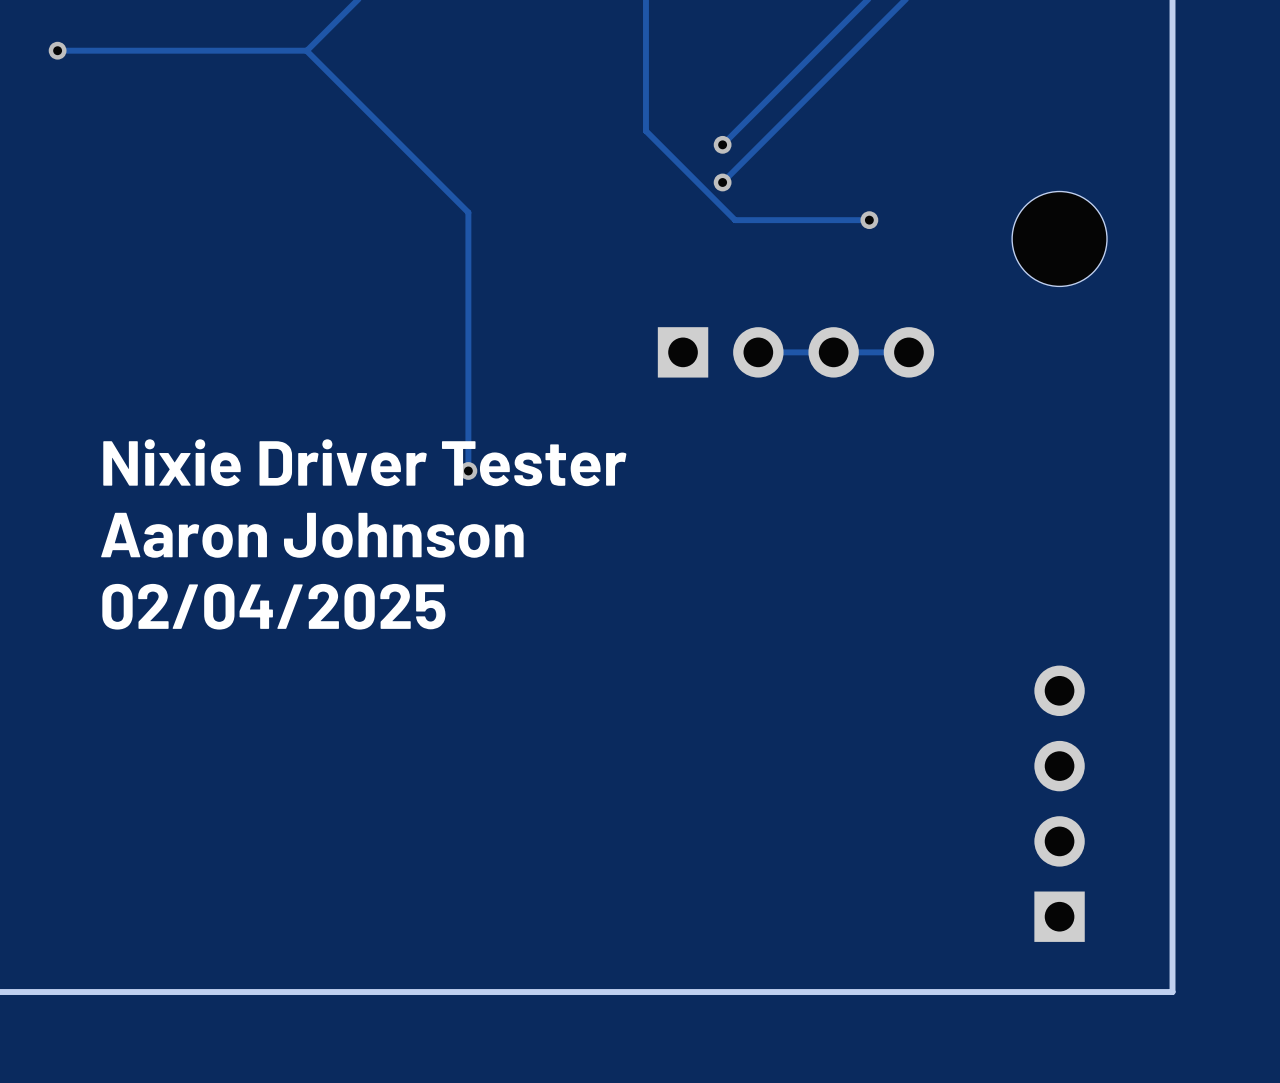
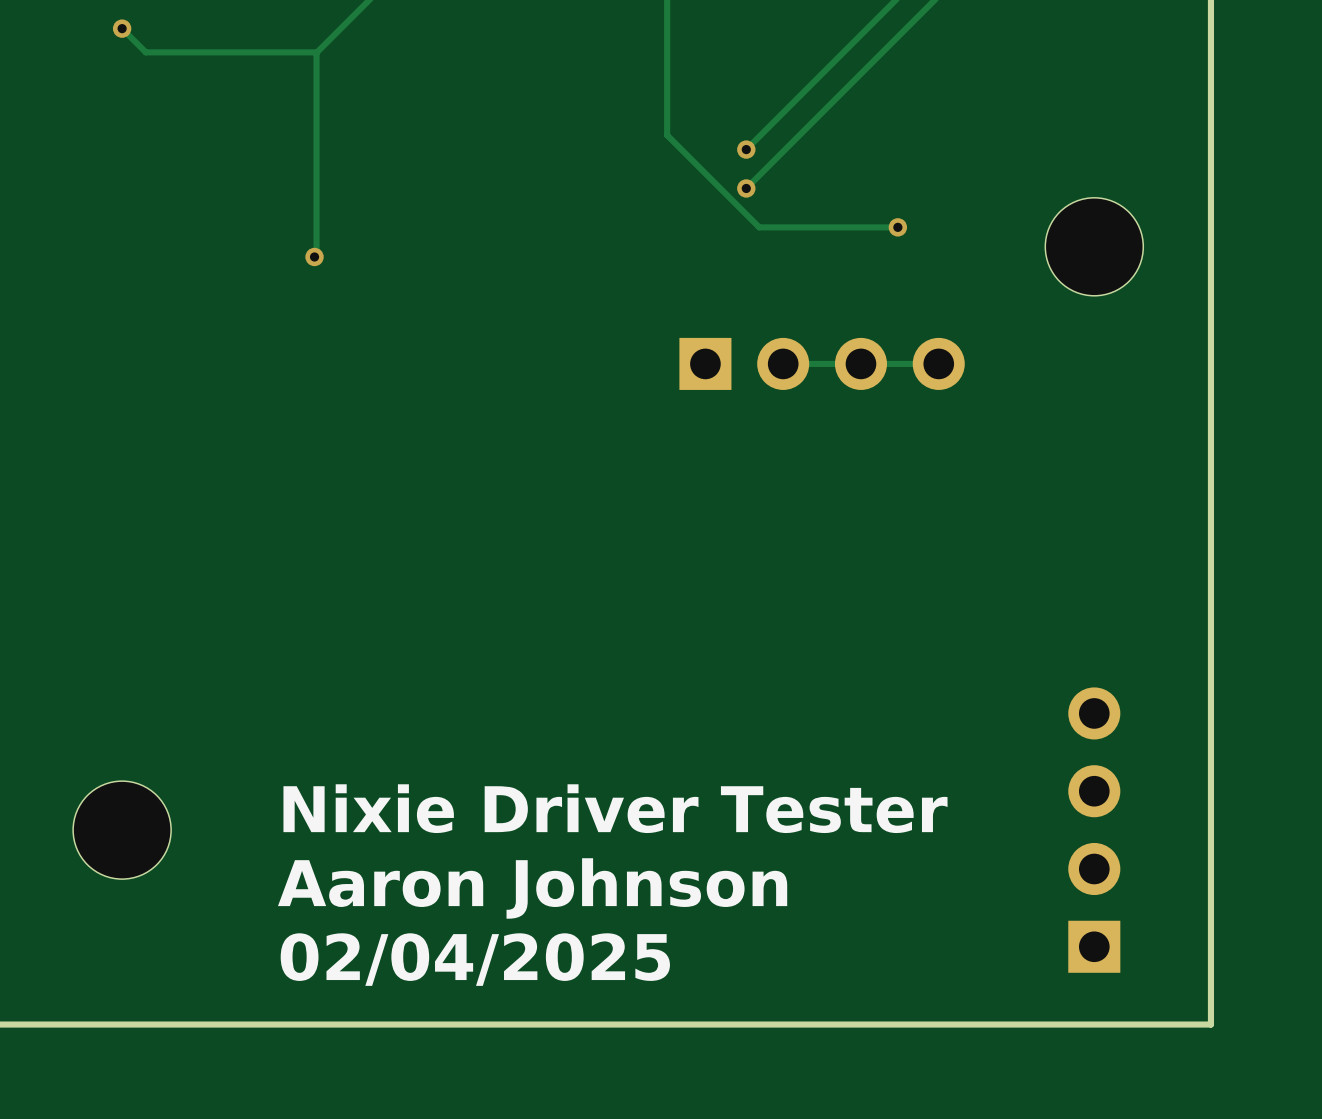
via position: (57, 50) -> (122, 28)
track: (141, 50) (57, 50) -> (145, 52) (122, 28)
track: (306, 50) (468, 212) (468, 470) -> (316, 52) (316, 254) (314, 256)
via: none -> (314, 256)
text position: Nixie Driver Tester (364, 462) -> Nixie Driver Tester (615, 808)
via: (468, 470) -> none
text position: Aaron Johnson (312, 535) -> Aaron Johnson (532, 888)
text position: 02/04/2025 (273, 606) -> 02/04/2025 (475, 959)
part: none -> (122, 830)

